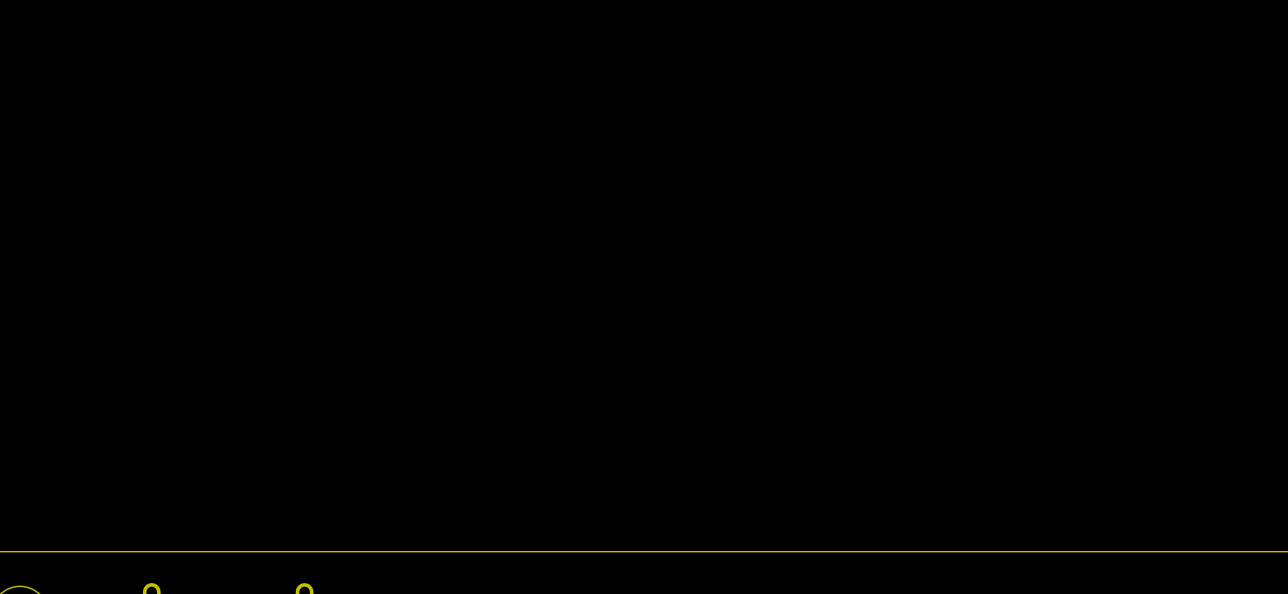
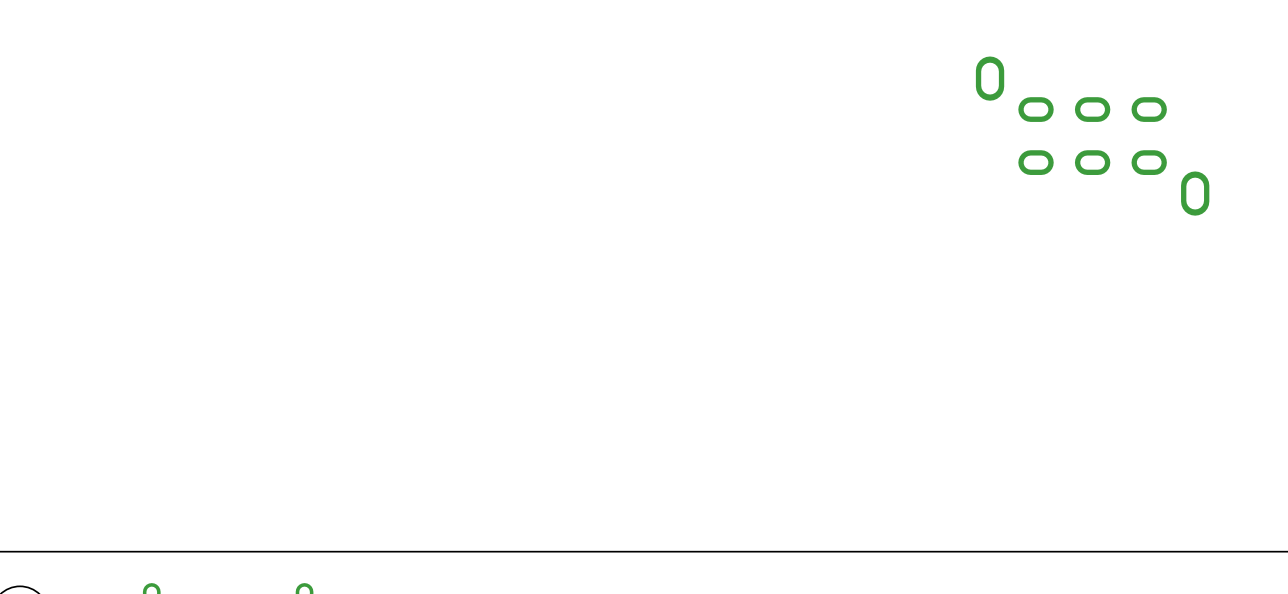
part: none -> (1092, 136)

